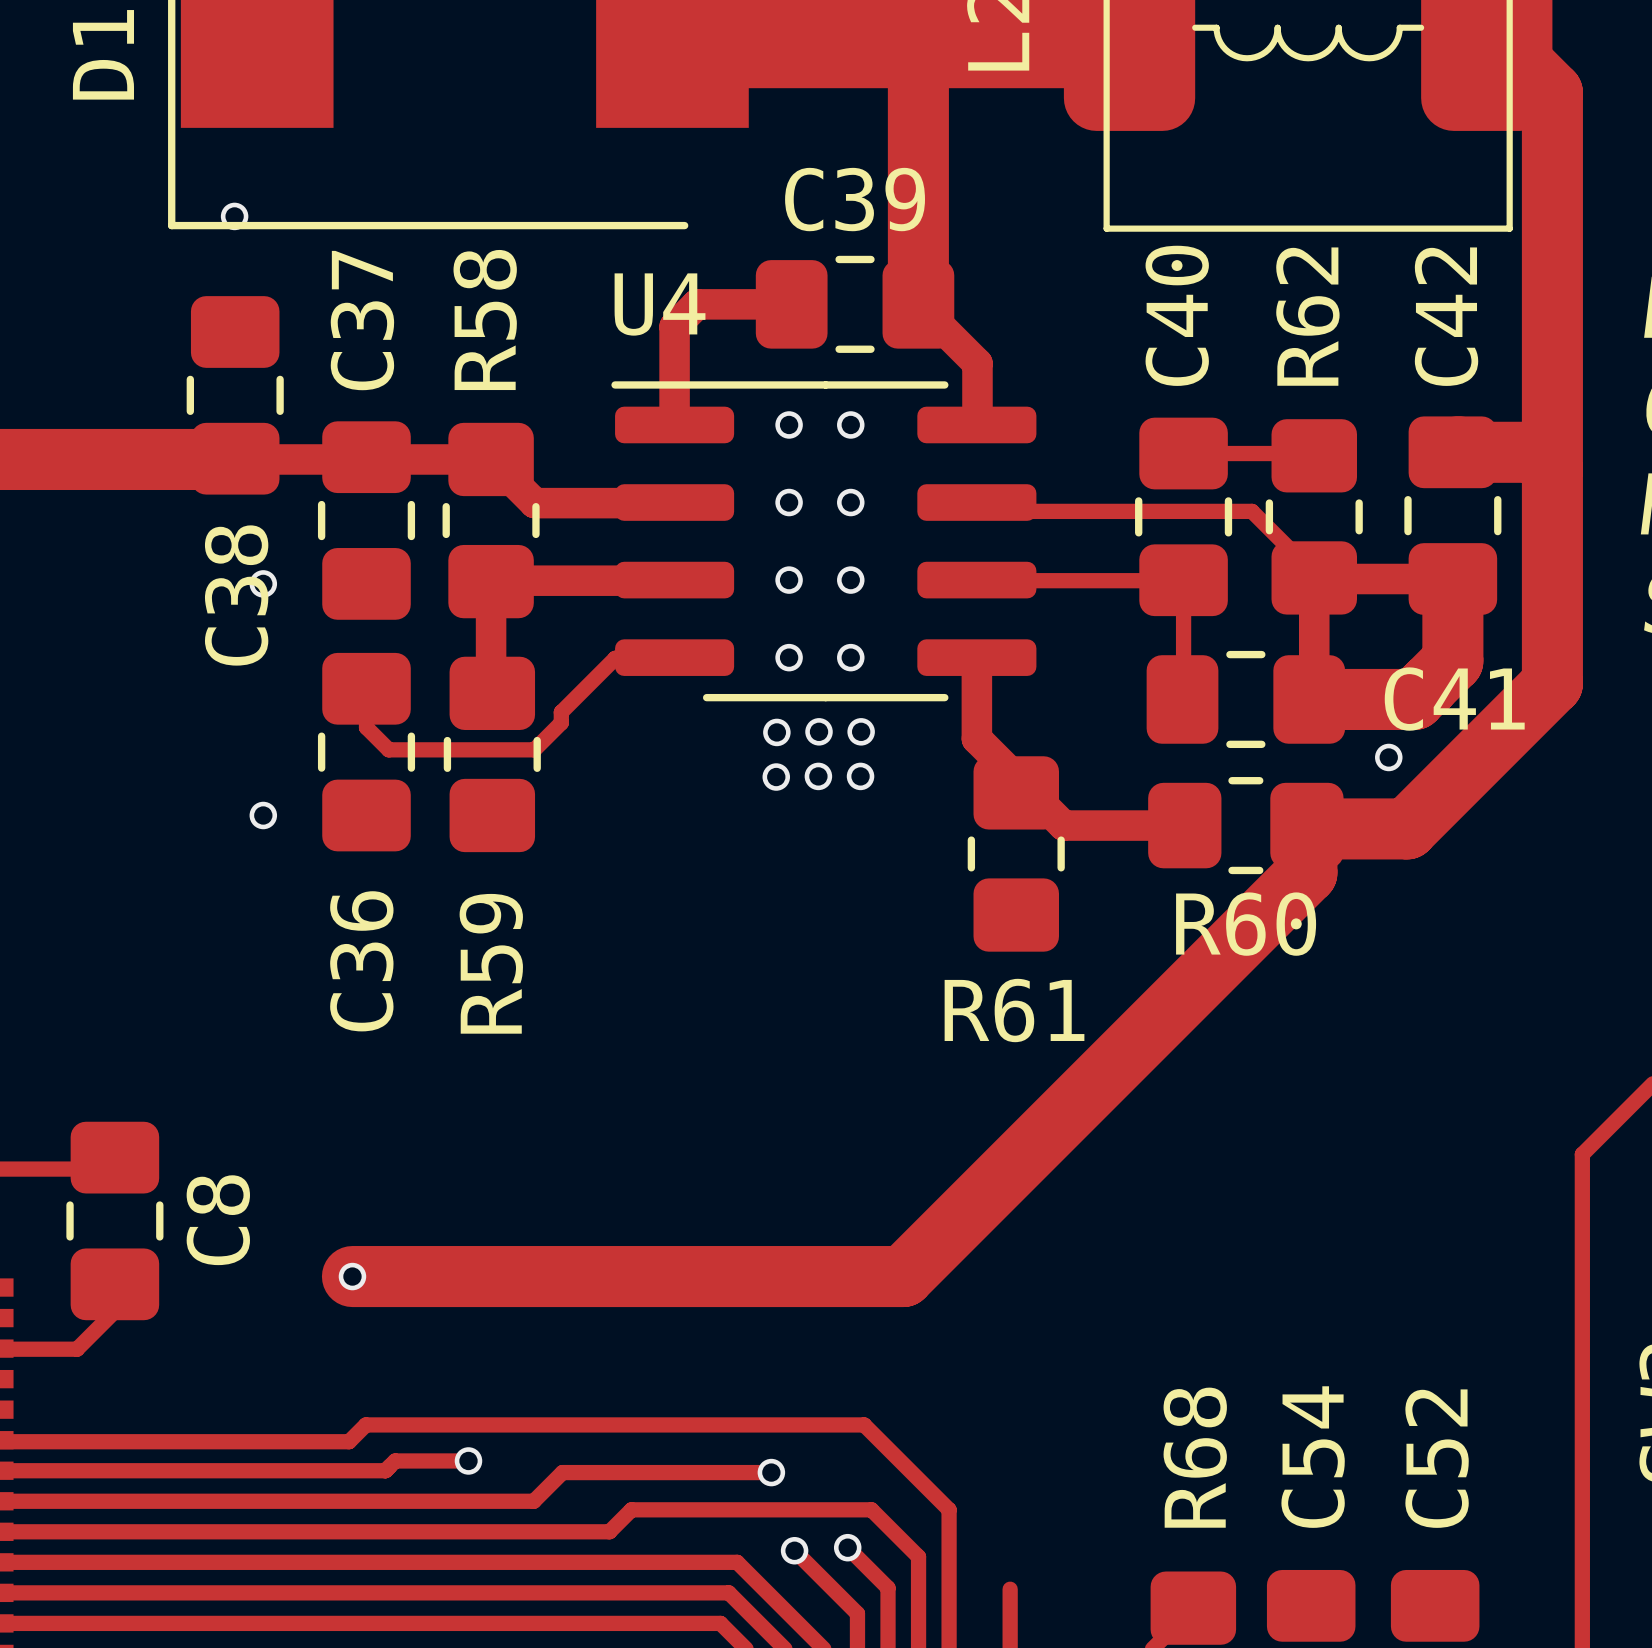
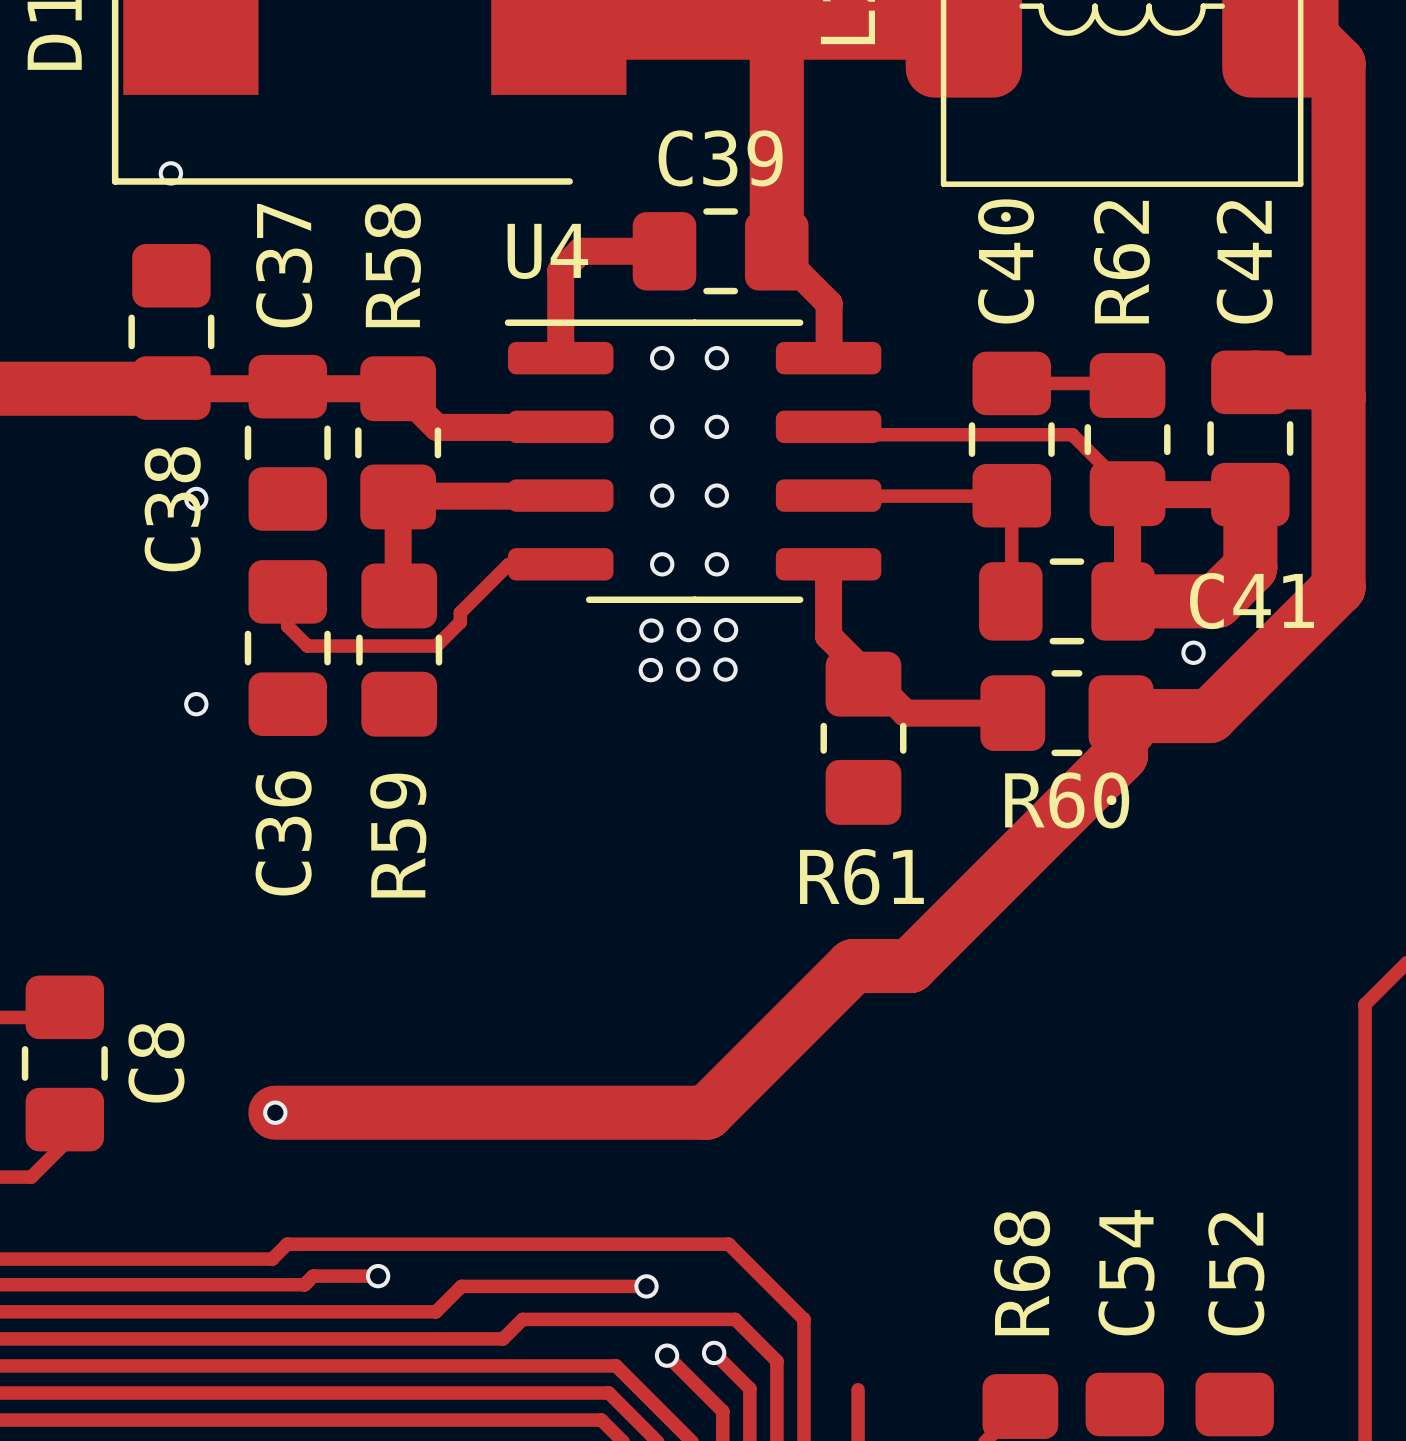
track: (1068, 1111) (903, 1276) (839, 1276) -> (910, 966) (853, 966) (706, 1112)

